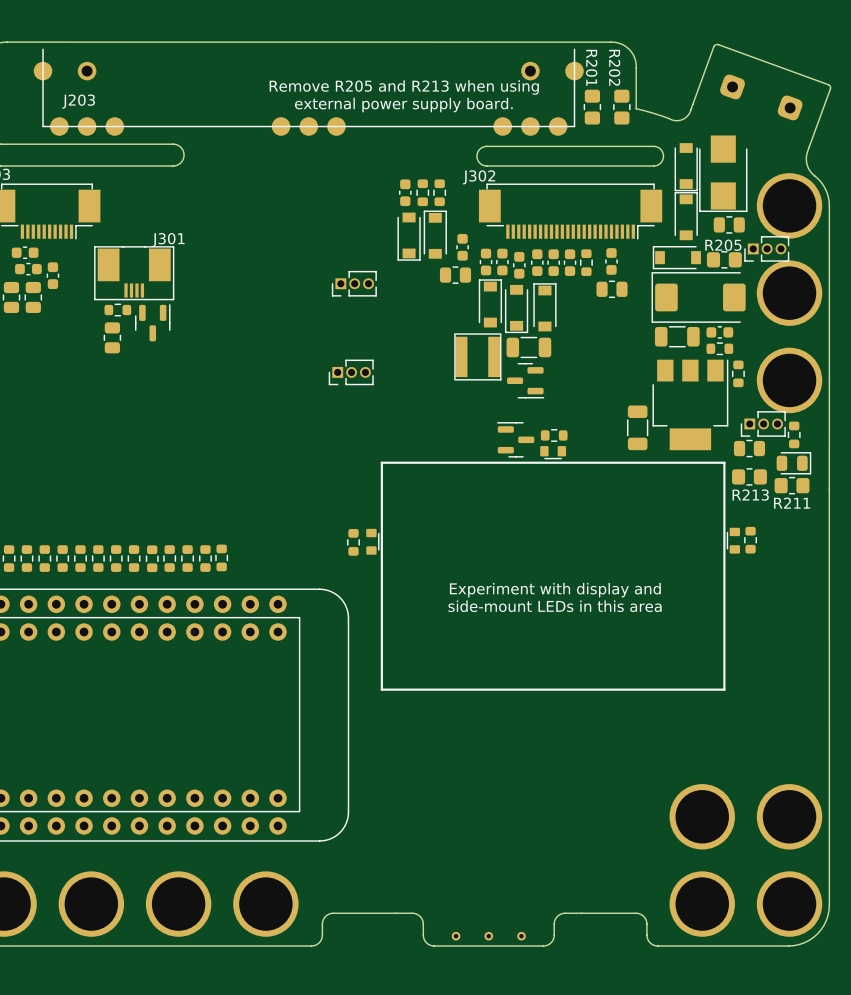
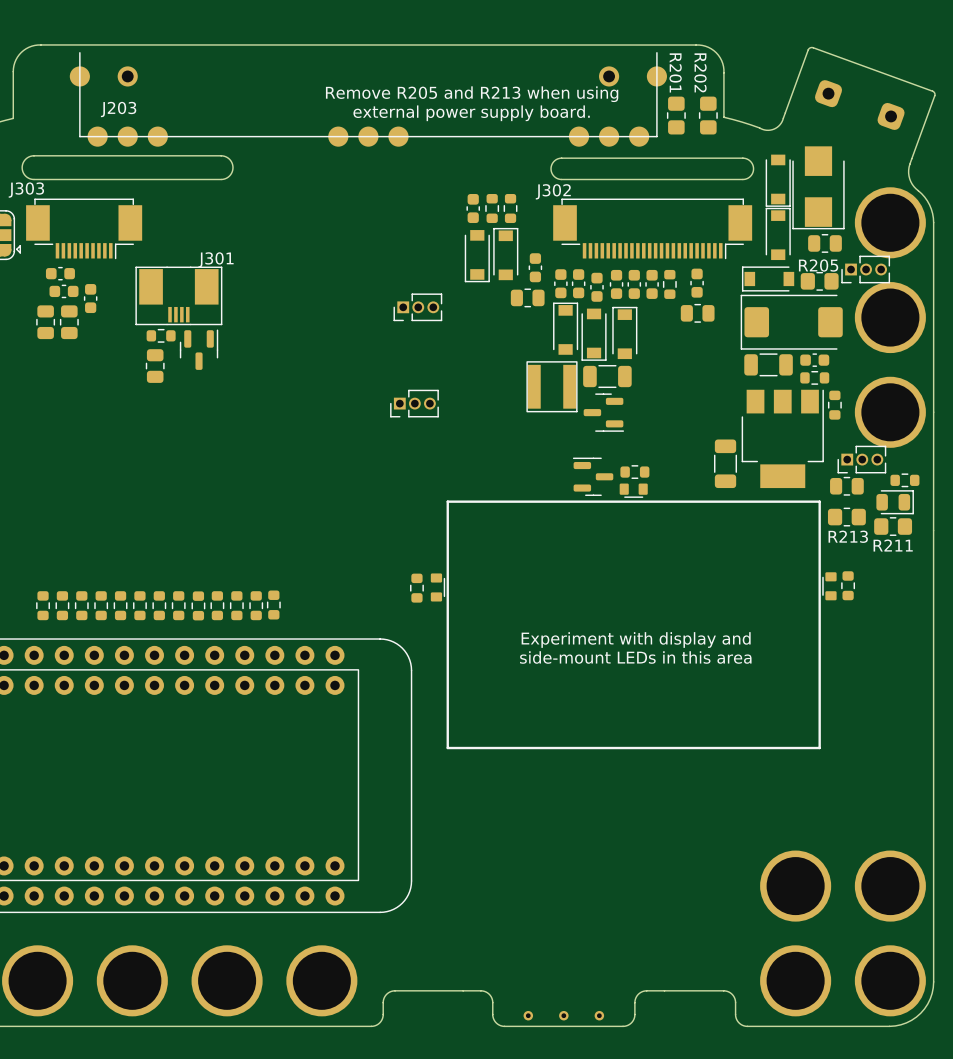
part rotation: 0° (794, 434) -> 90° clockwise (904, 480)

